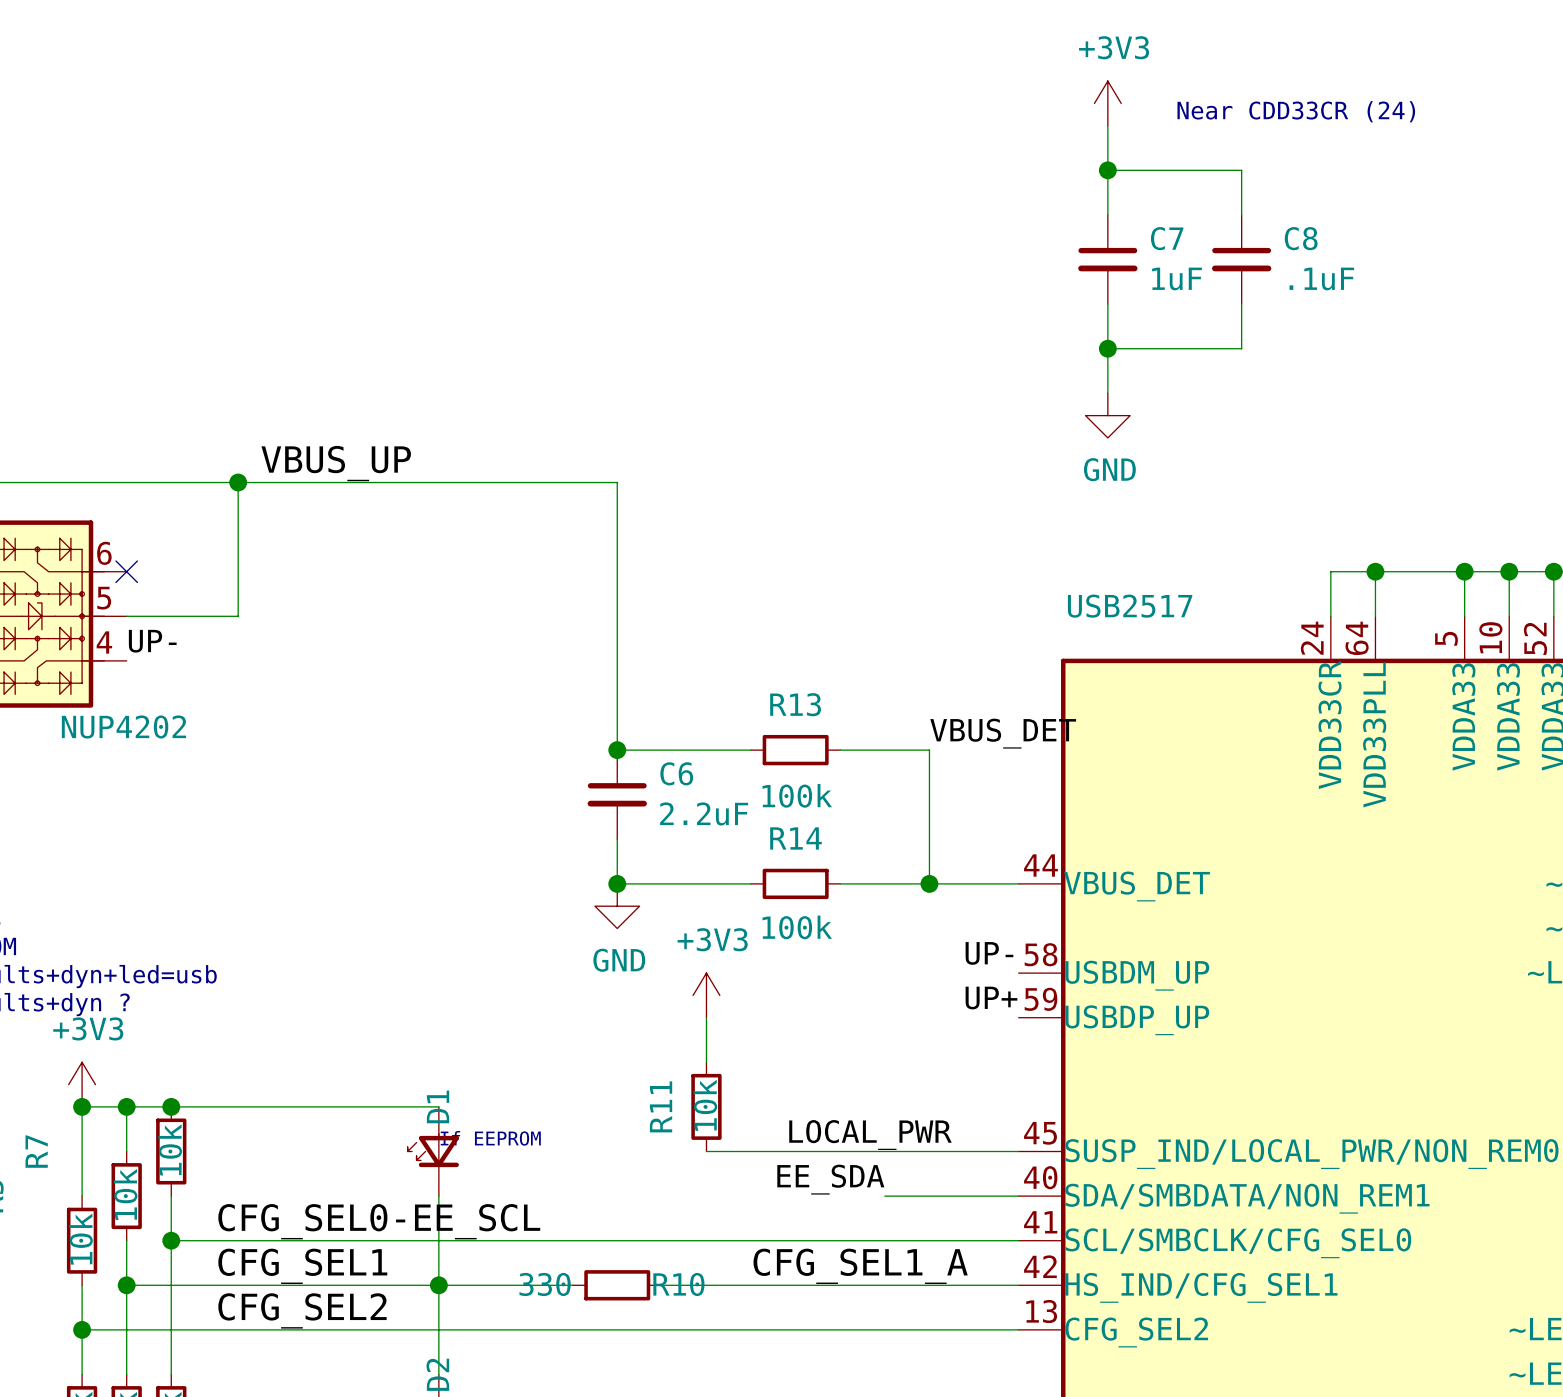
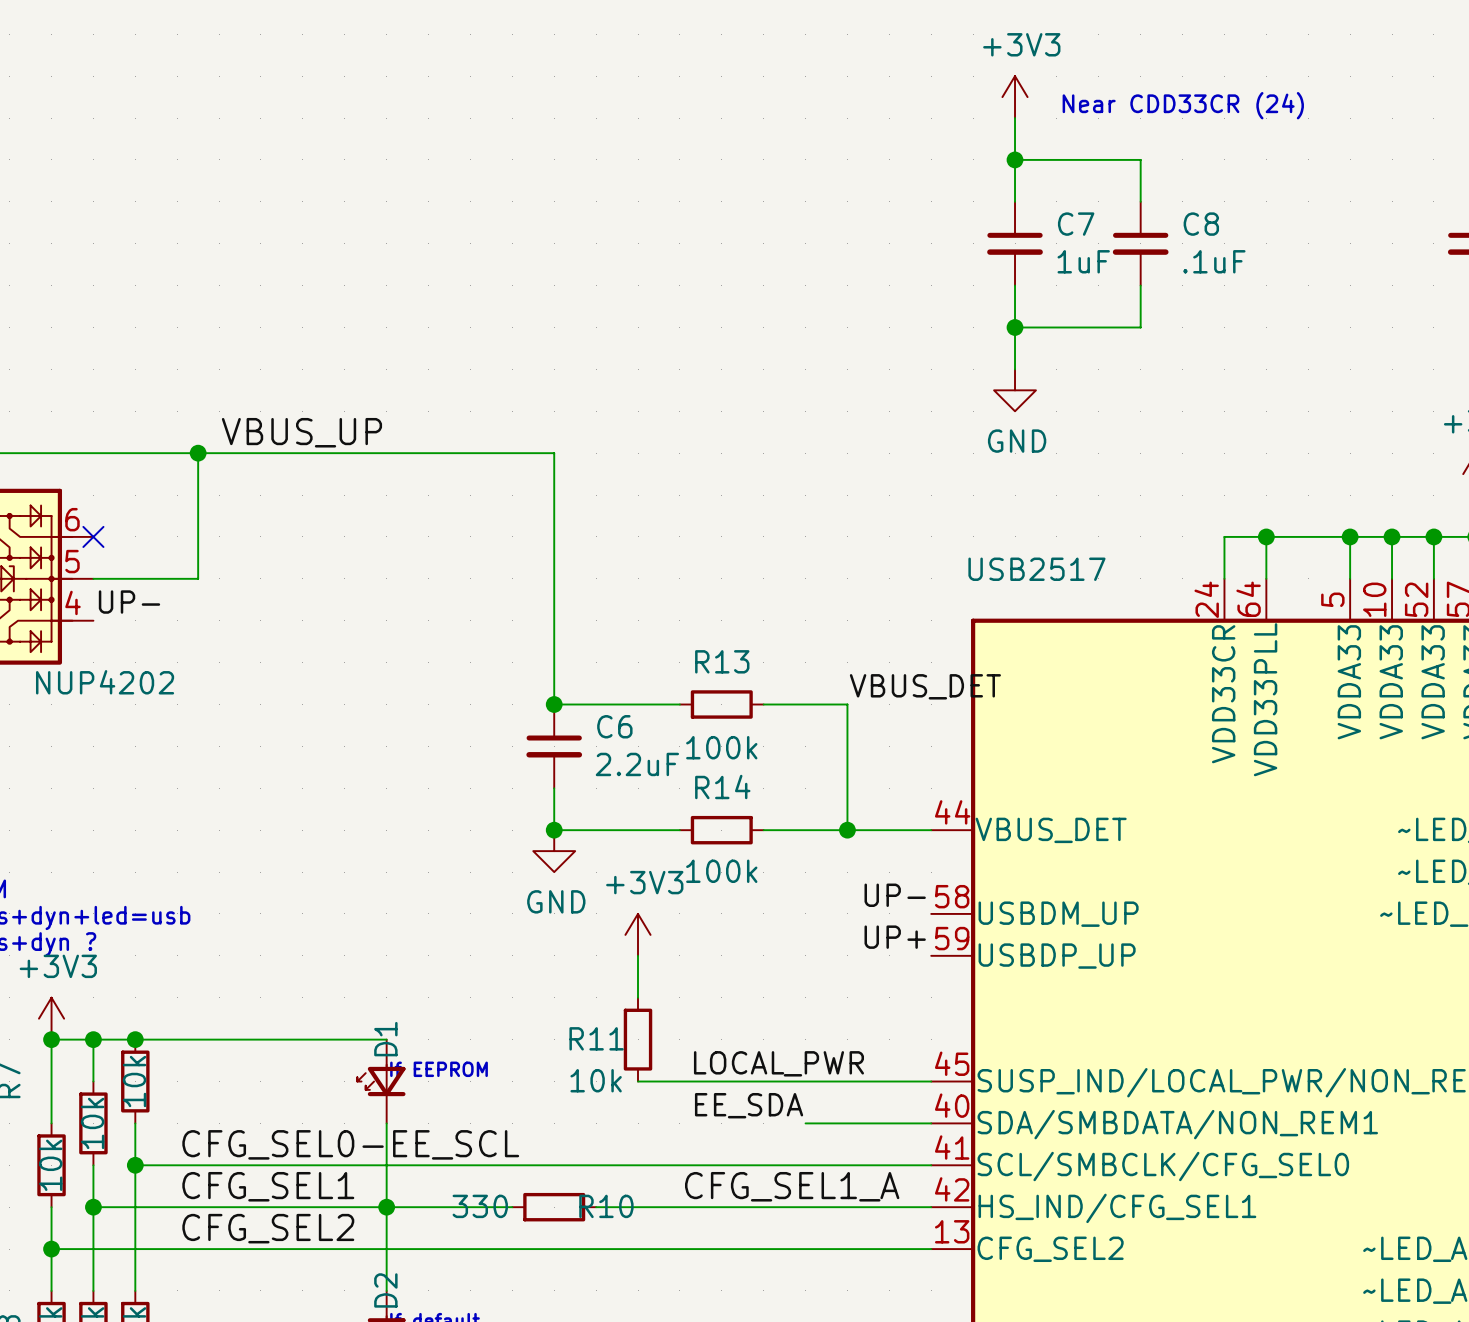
R11 value rotation: 0° (705, 1105) -> 90° clockwise (596, 1080)
R11 name rotation: 0° (661, 1106) -> 90° clockwise (596, 1038)

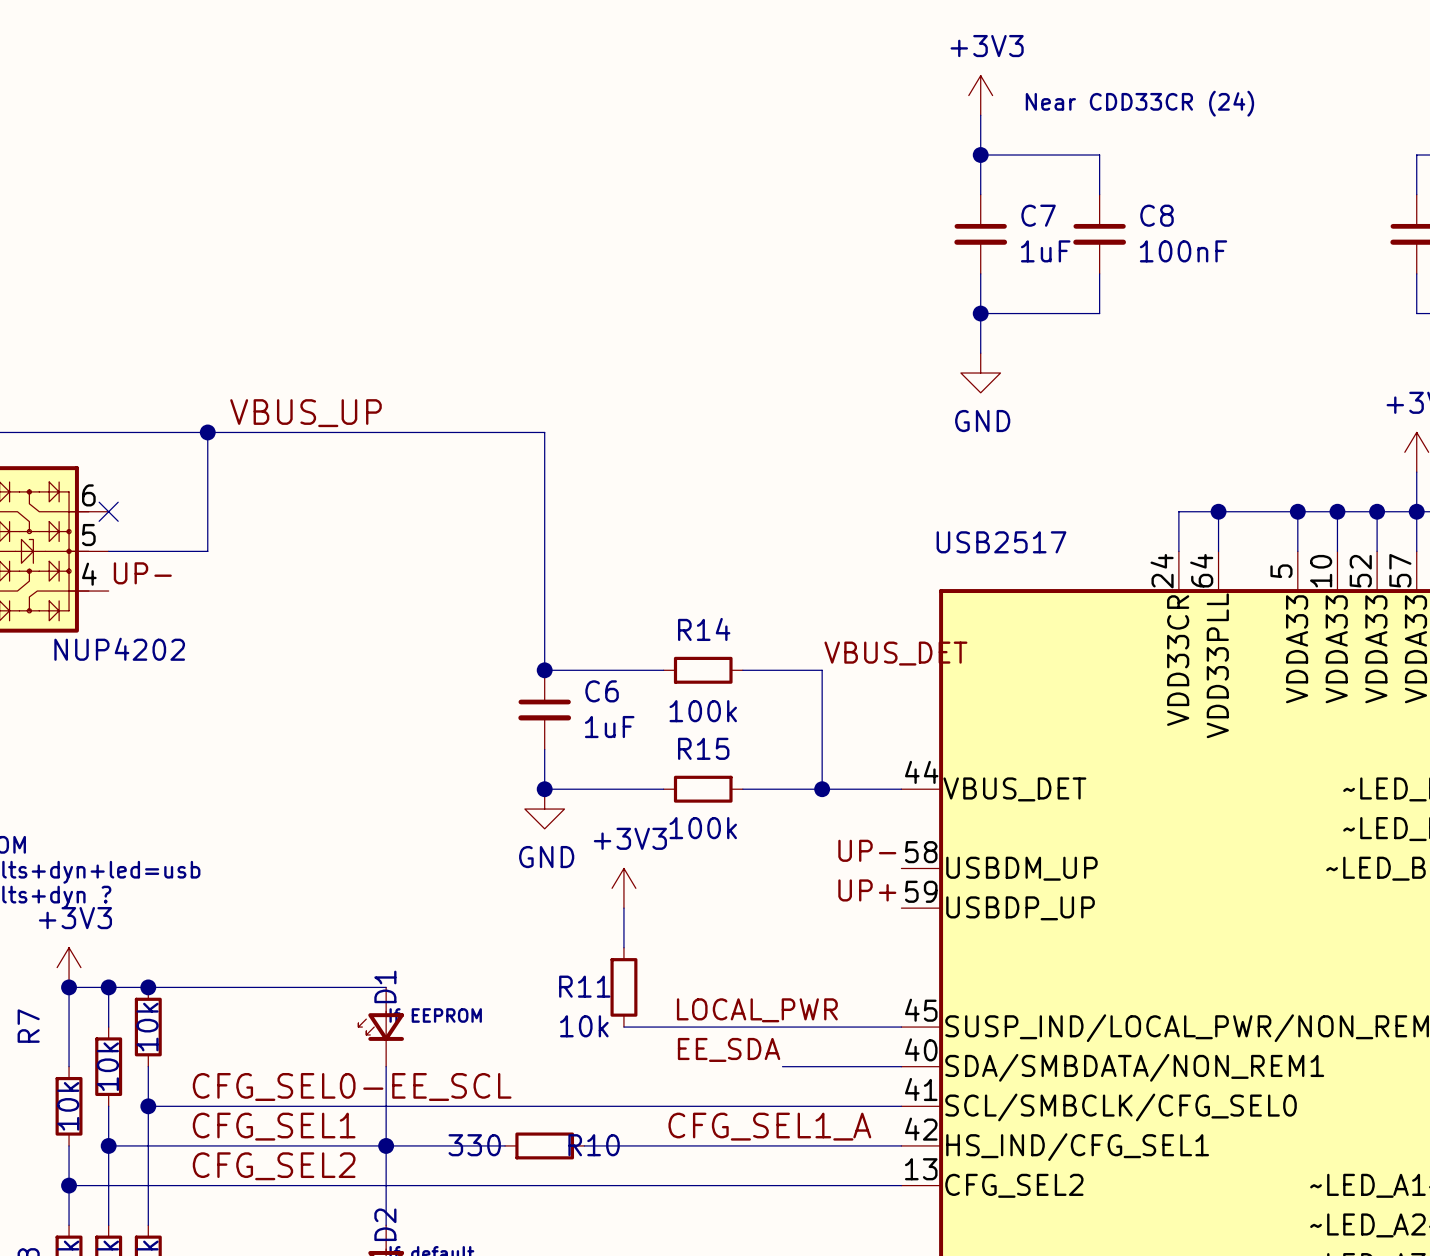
C8 value: .1uF (1214, 261) -> 100nF (1183, 251)
R13 name: R13 (722, 661) -> R14 (704, 629)
C6 value: 2.2uF (637, 764) -> 1uF (609, 727)
R14 name: R14 (722, 787) -> R15 (703, 748)

